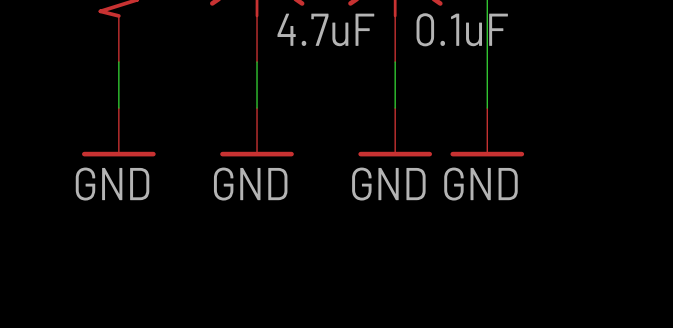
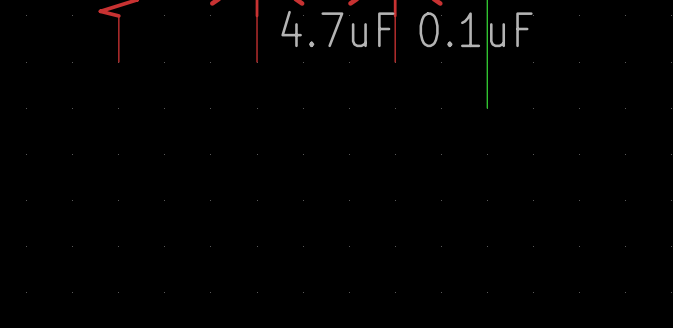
wire: (118, 62) (118, 108) -> none
wire: (257, 62) (257, 108) -> none
wire: (395, 62) (395, 108) -> none
power symbol: GND (118, 132) -> none
power symbol: GND (257, 132) -> none
power symbol: GND (395, 132) -> none
power symbol: GND (487, 132) -> none

